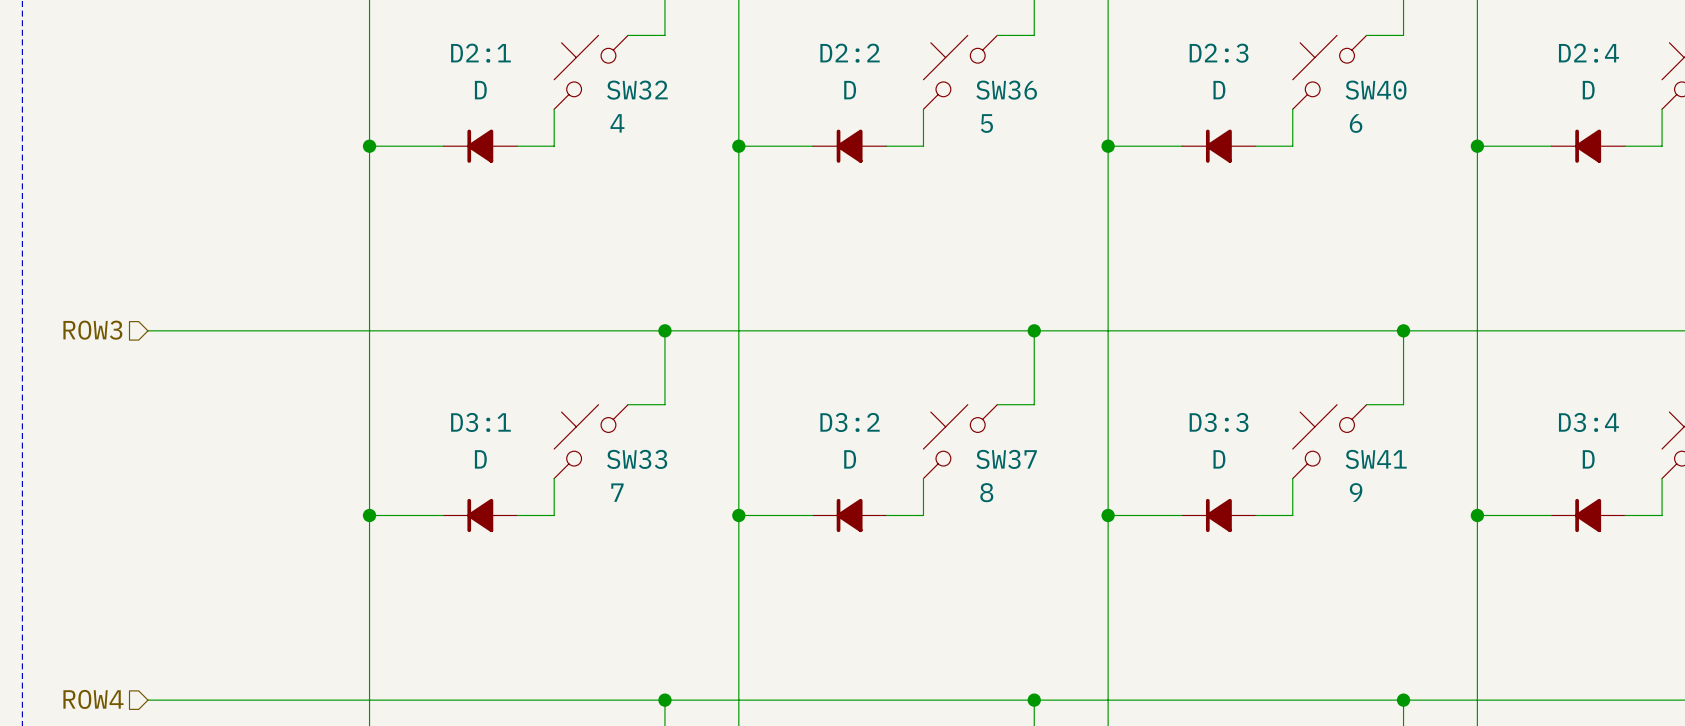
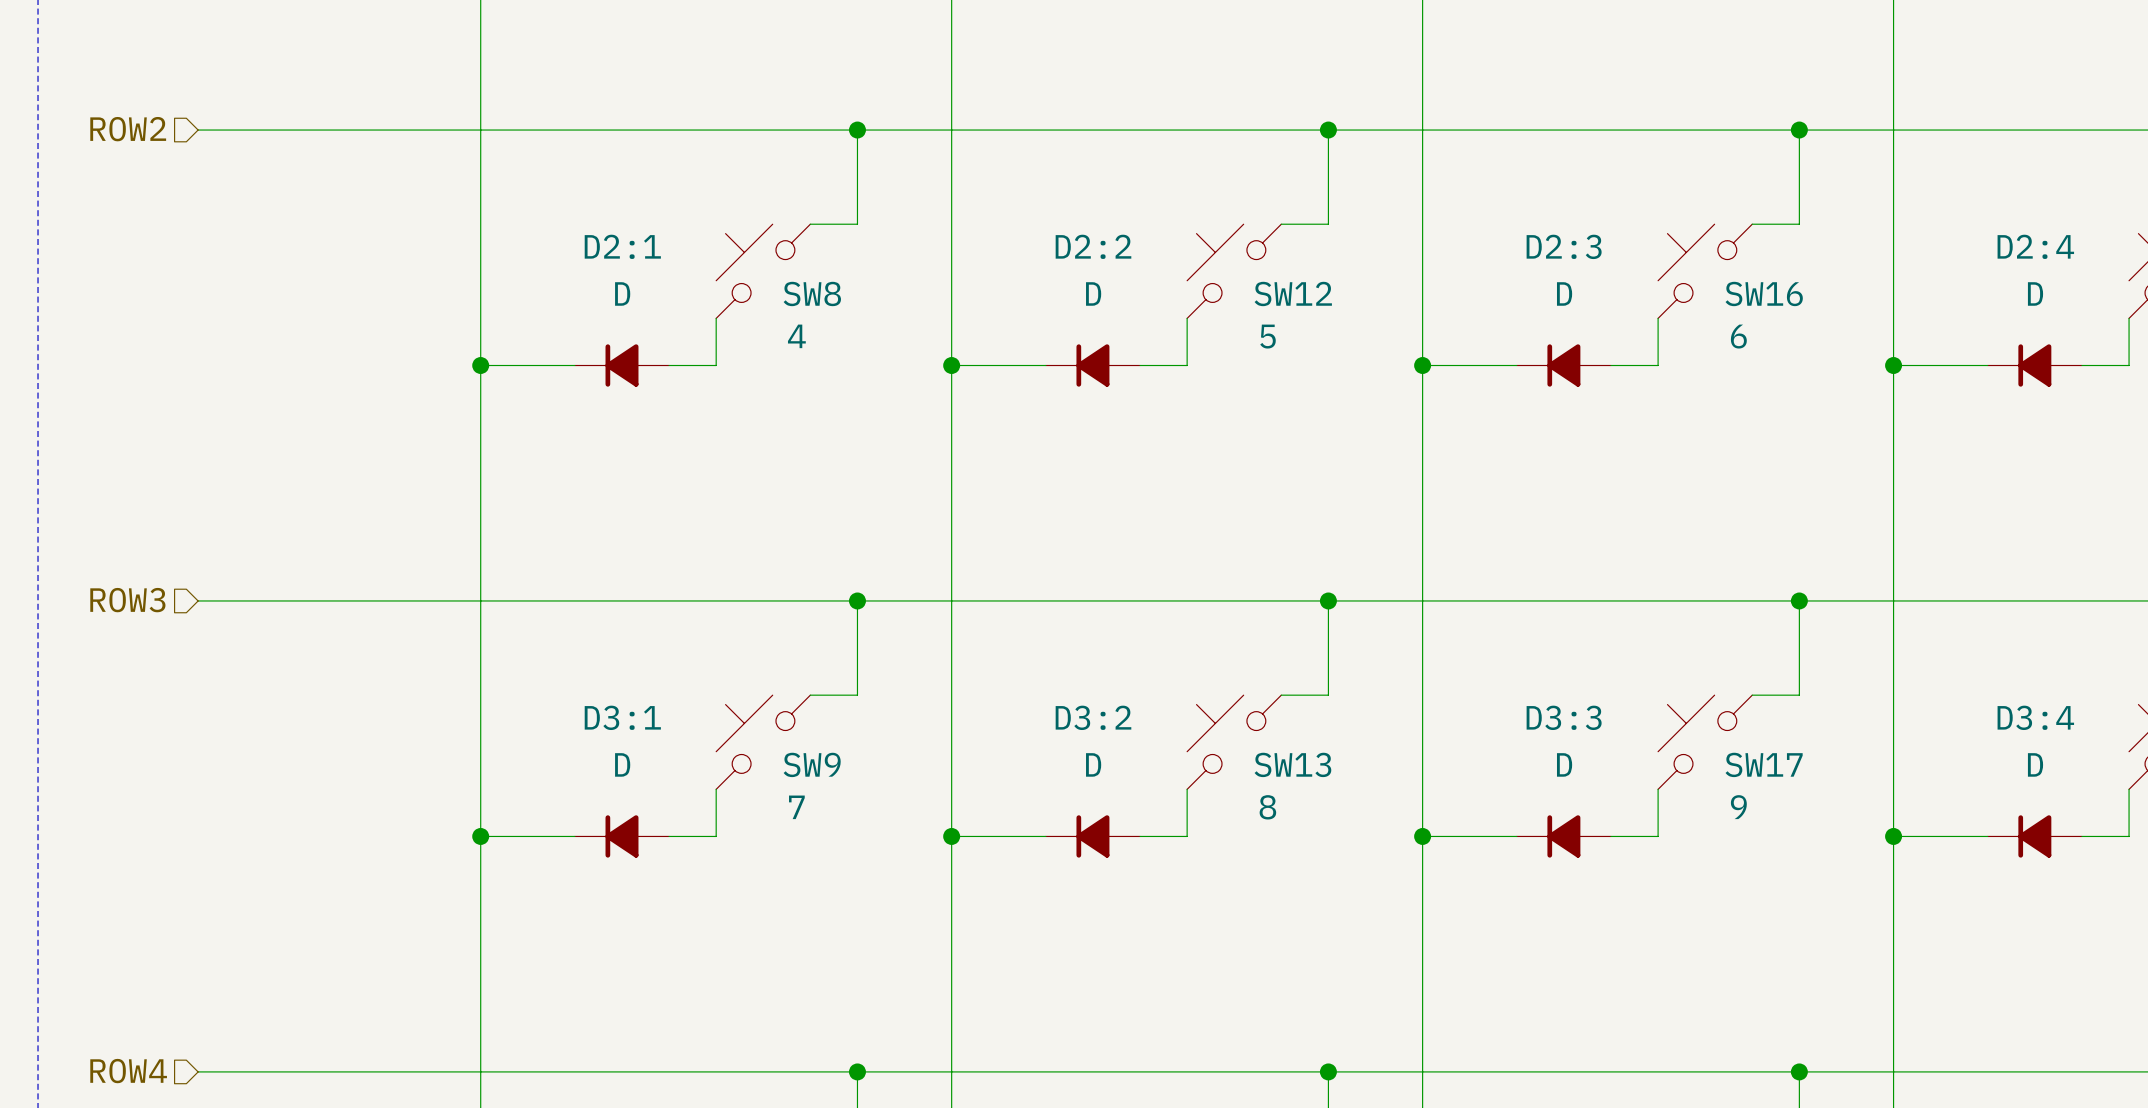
SW32 name: SW32 (637, 90) -> SW8 (812, 293)
SW36 name: SW36 (1006, 90) -> SW12 (1293, 293)
SW40 name: SW40 (1376, 90) -> SW16 (1764, 293)
SW33 name: SW33 (637, 459) -> SW9 (812, 764)
SW37 name: SW37 (1006, 459) -> SW13 (1292, 764)
SW41 name: SW41 (1376, 459) -> SW17 (1764, 764)

